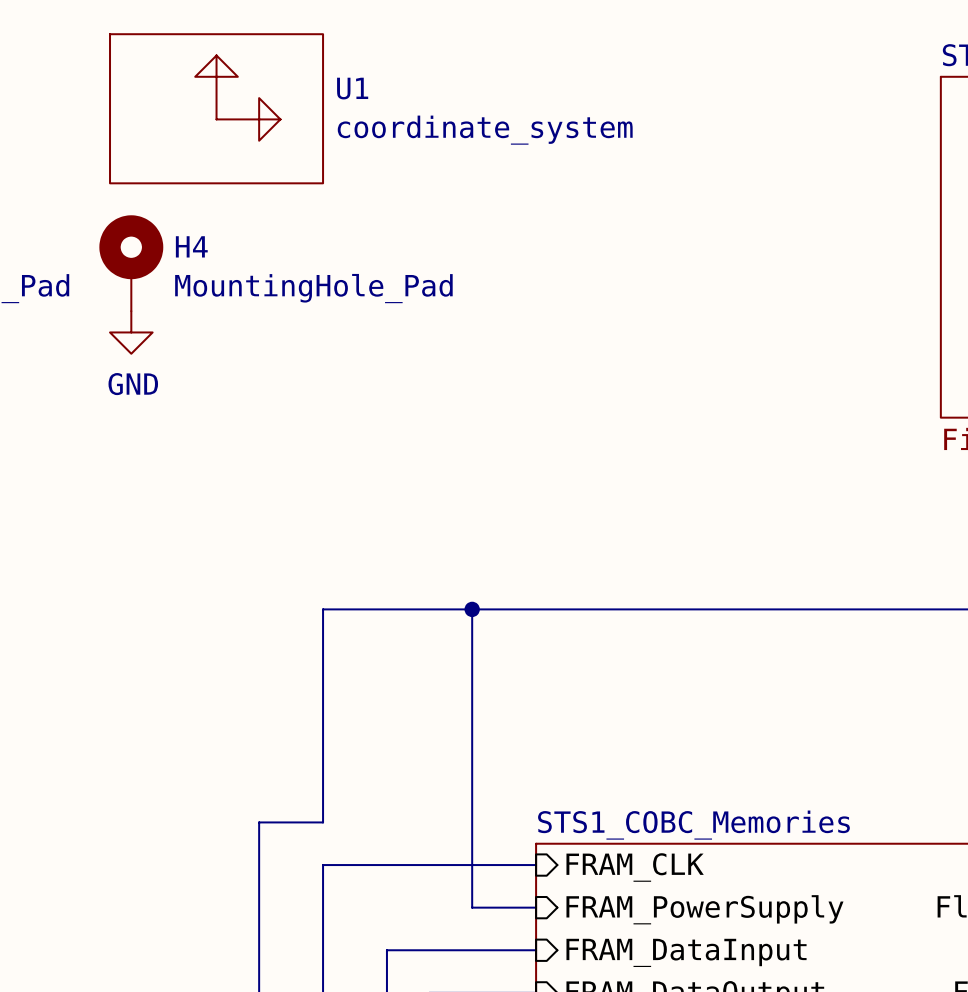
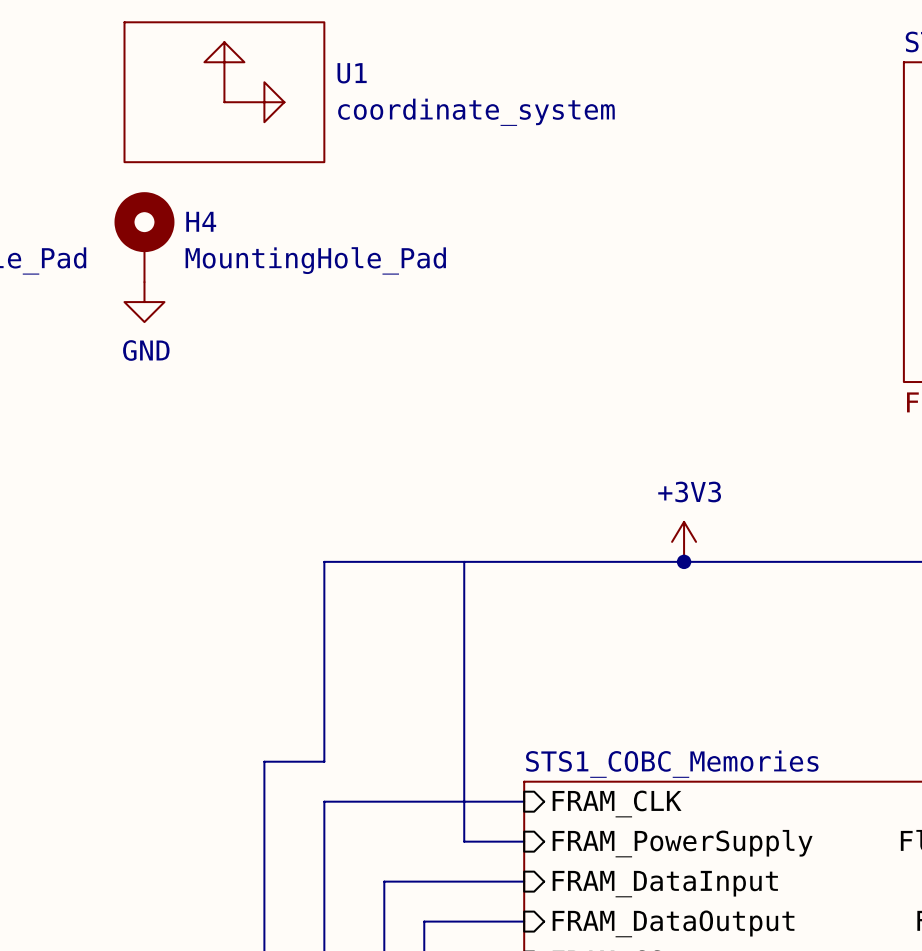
power symbol: none -> +3V3 (684, 541)
junction: (472, 609) -> none
junction: none -> (684, 561)

